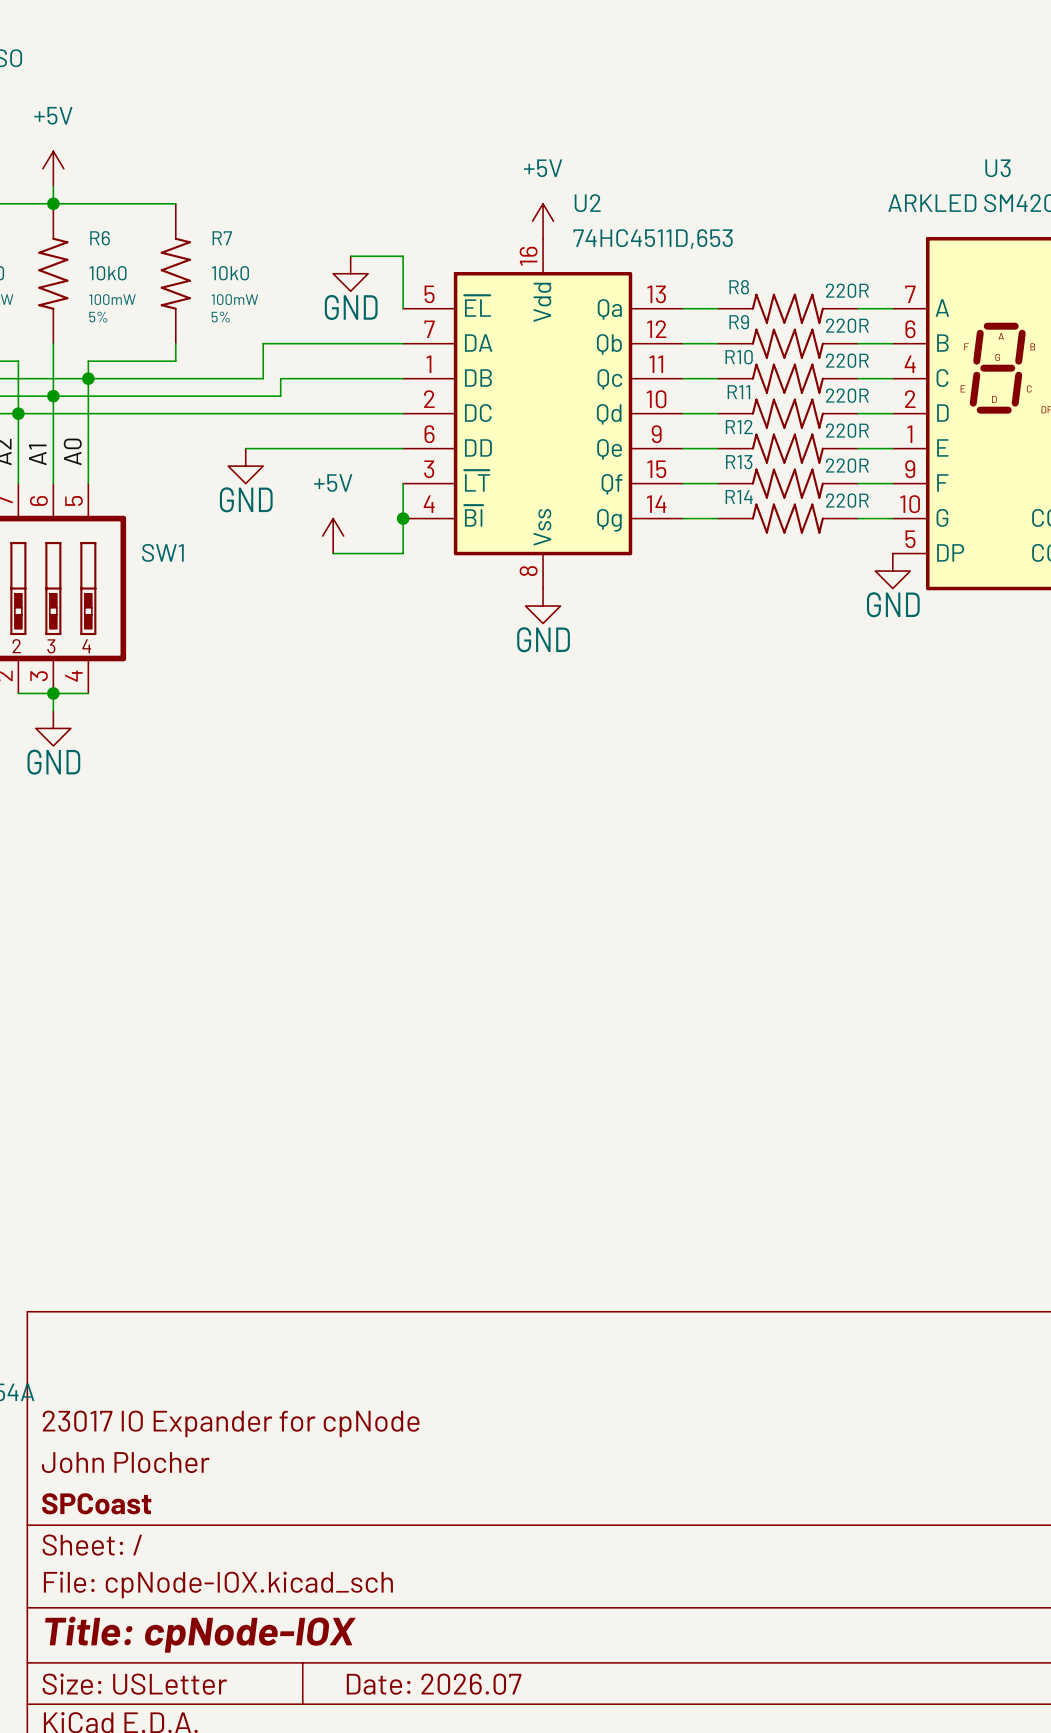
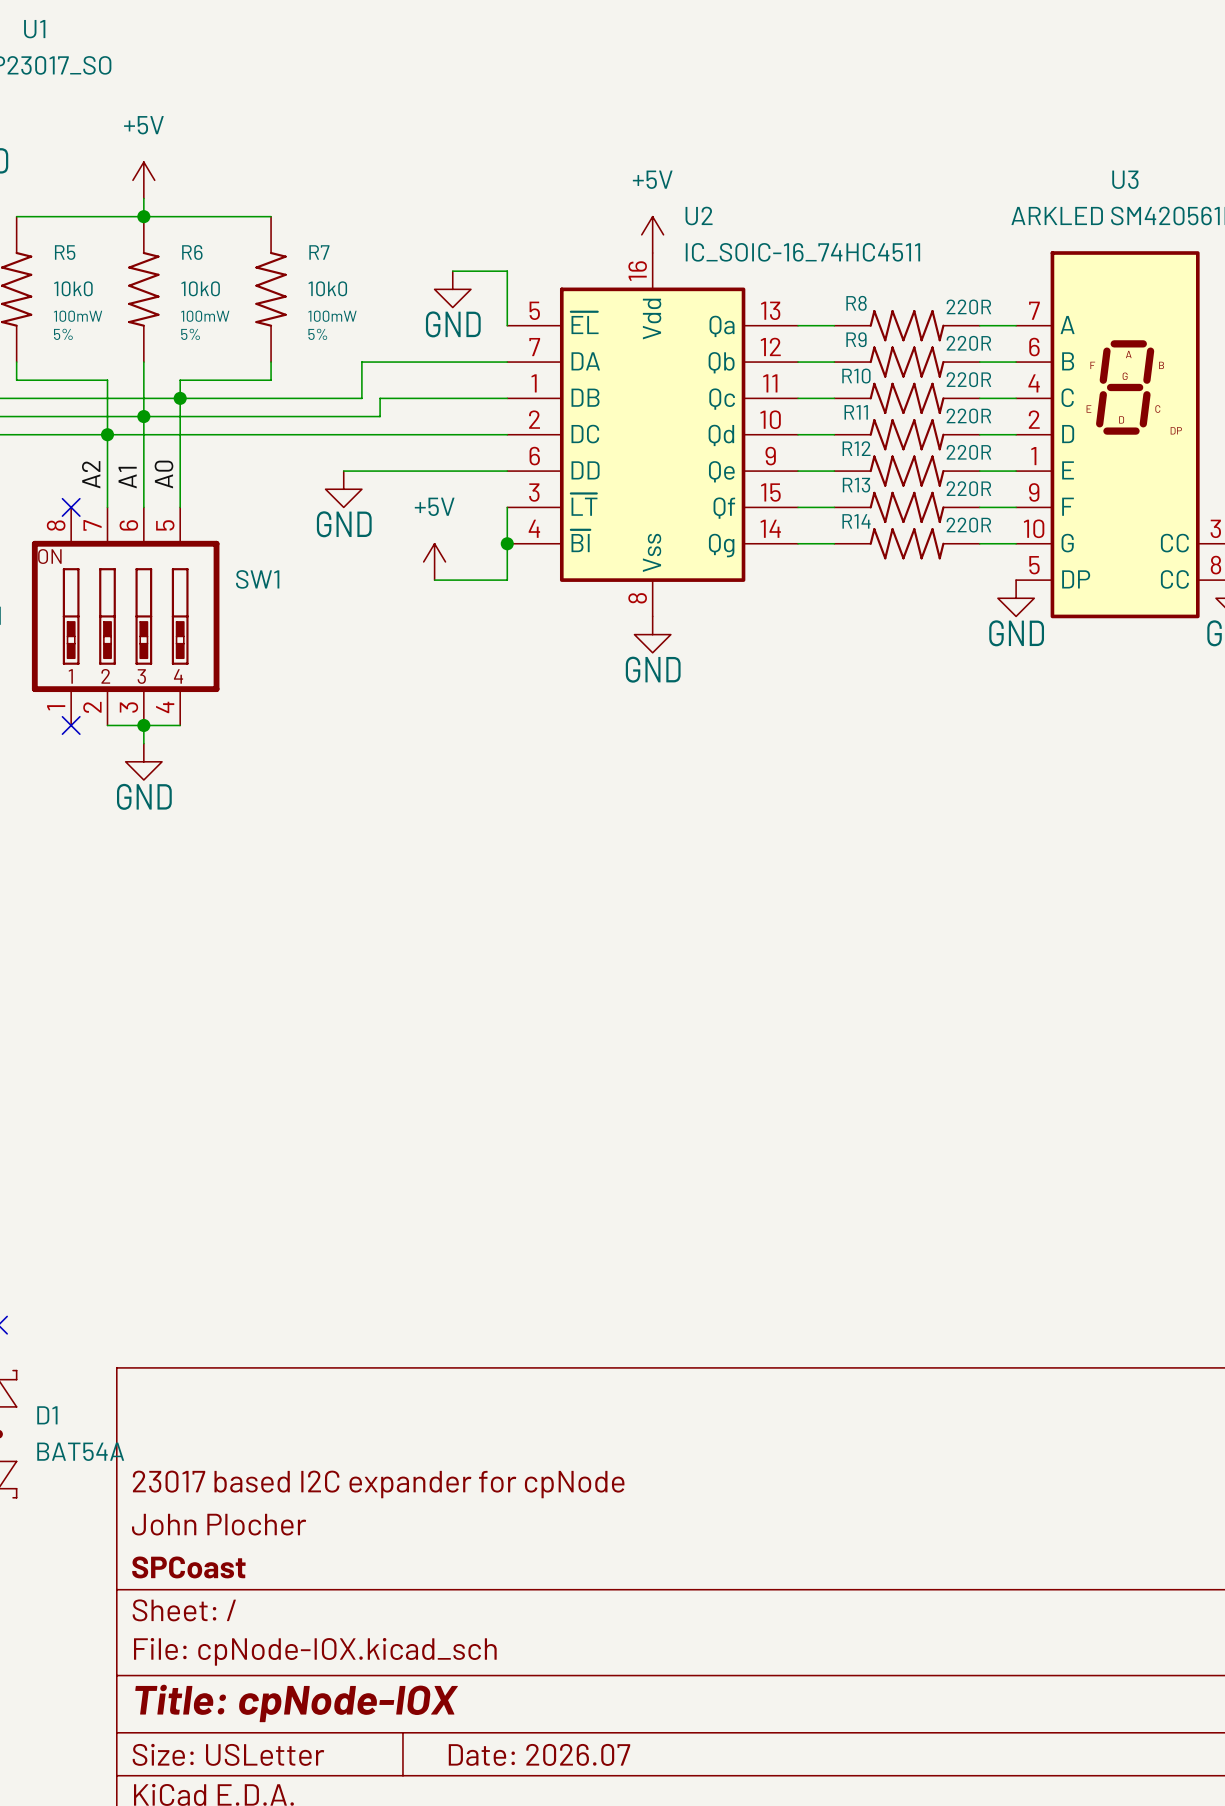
U2 value: 74HC4511D,653 (653, 239) -> IC_SOIC-16_74HC4511 (802, 252)
title block: 23017 IO Expander for cpNode (231, 1423) -> 23017 based I2C expander for cpNode (378, 1484)

